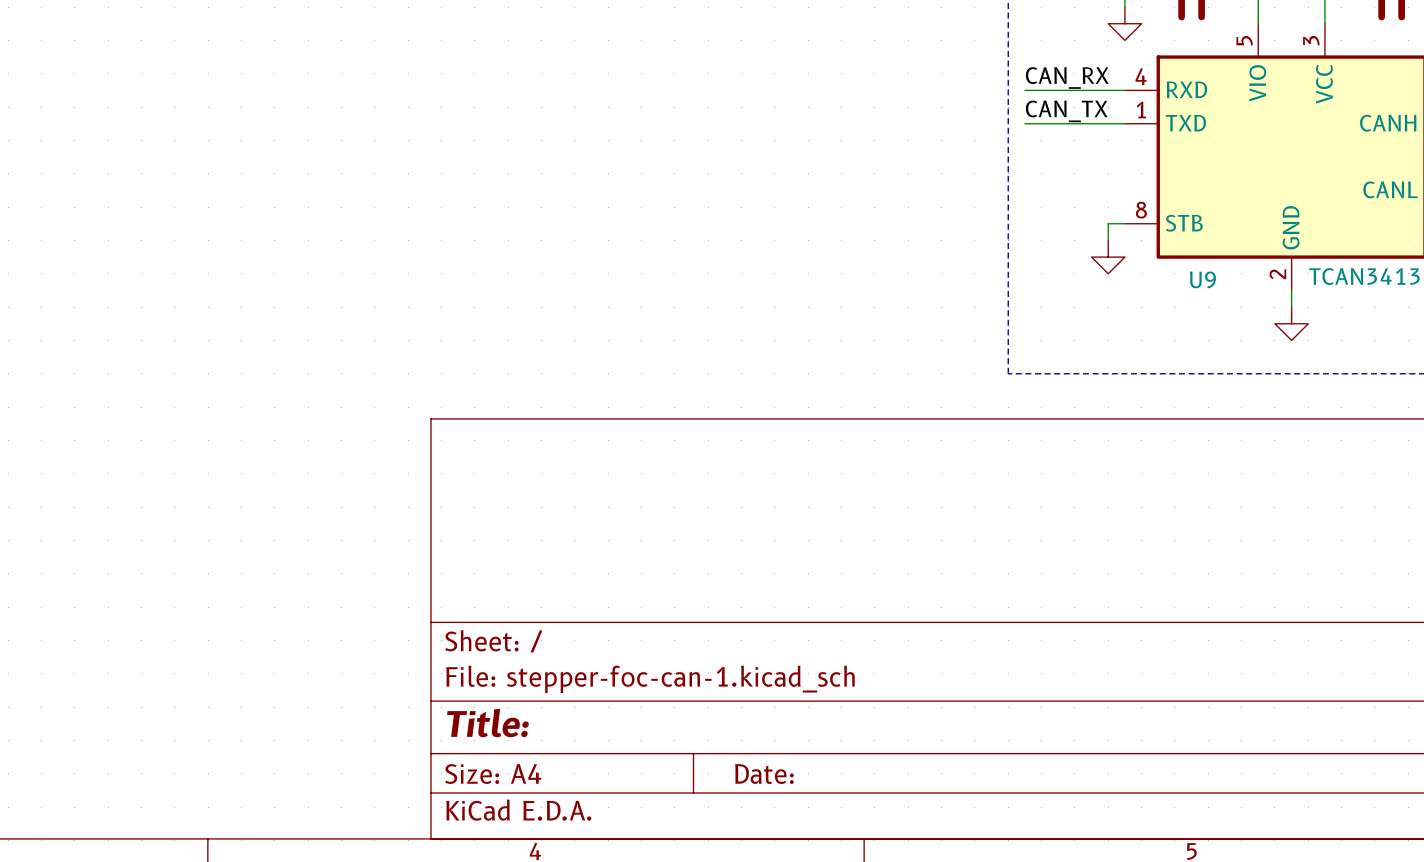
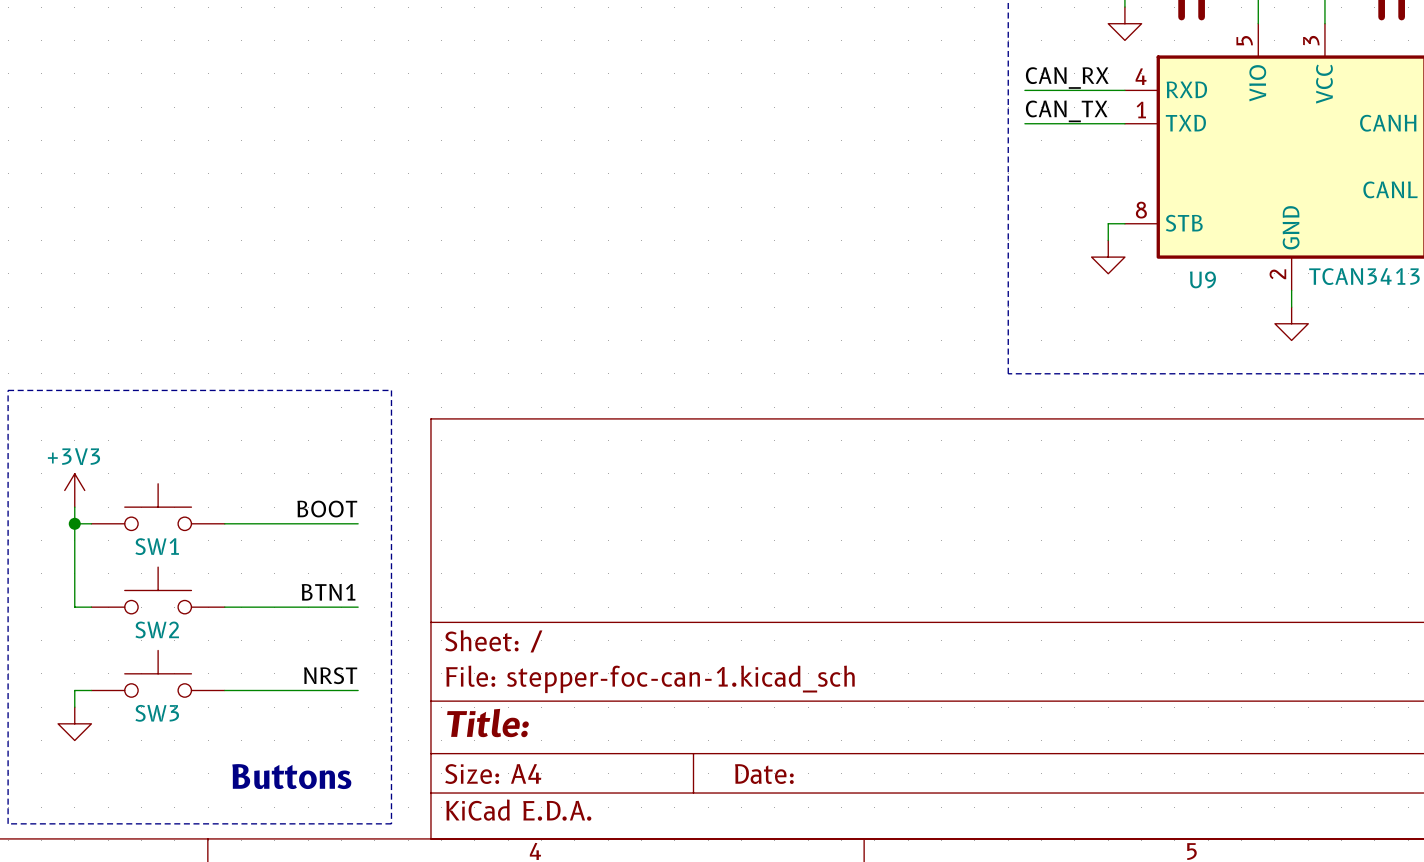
line: none -> (8, 390) (391, 390) (391, 823) (8, 823) (8, 390)
power symbol: none -> +3V3 (74, 490)
wire: none -> (74, 507) (74, 607) (91, 607)
SW1: none -> (158, 507)
label: none -> BOOT (327, 509)
wire: none -> (74, 523) (91, 523)
junction: none -> (74, 523)
wire: none -> (224, 523) (358, 523)
SW2: none -> (158, 590)
label: none -> BTN1 (328, 592)
wire: none -> (224, 607) (358, 607)
SW3: none -> (158, 673)
label: none -> NRST (330, 675)
wire: none -> (91, 690) (74, 690) (74, 707)
wire: none -> (224, 690) (358, 690)
power symbol: none -> (74, 723)
text: none -> Buttons (291, 776)

